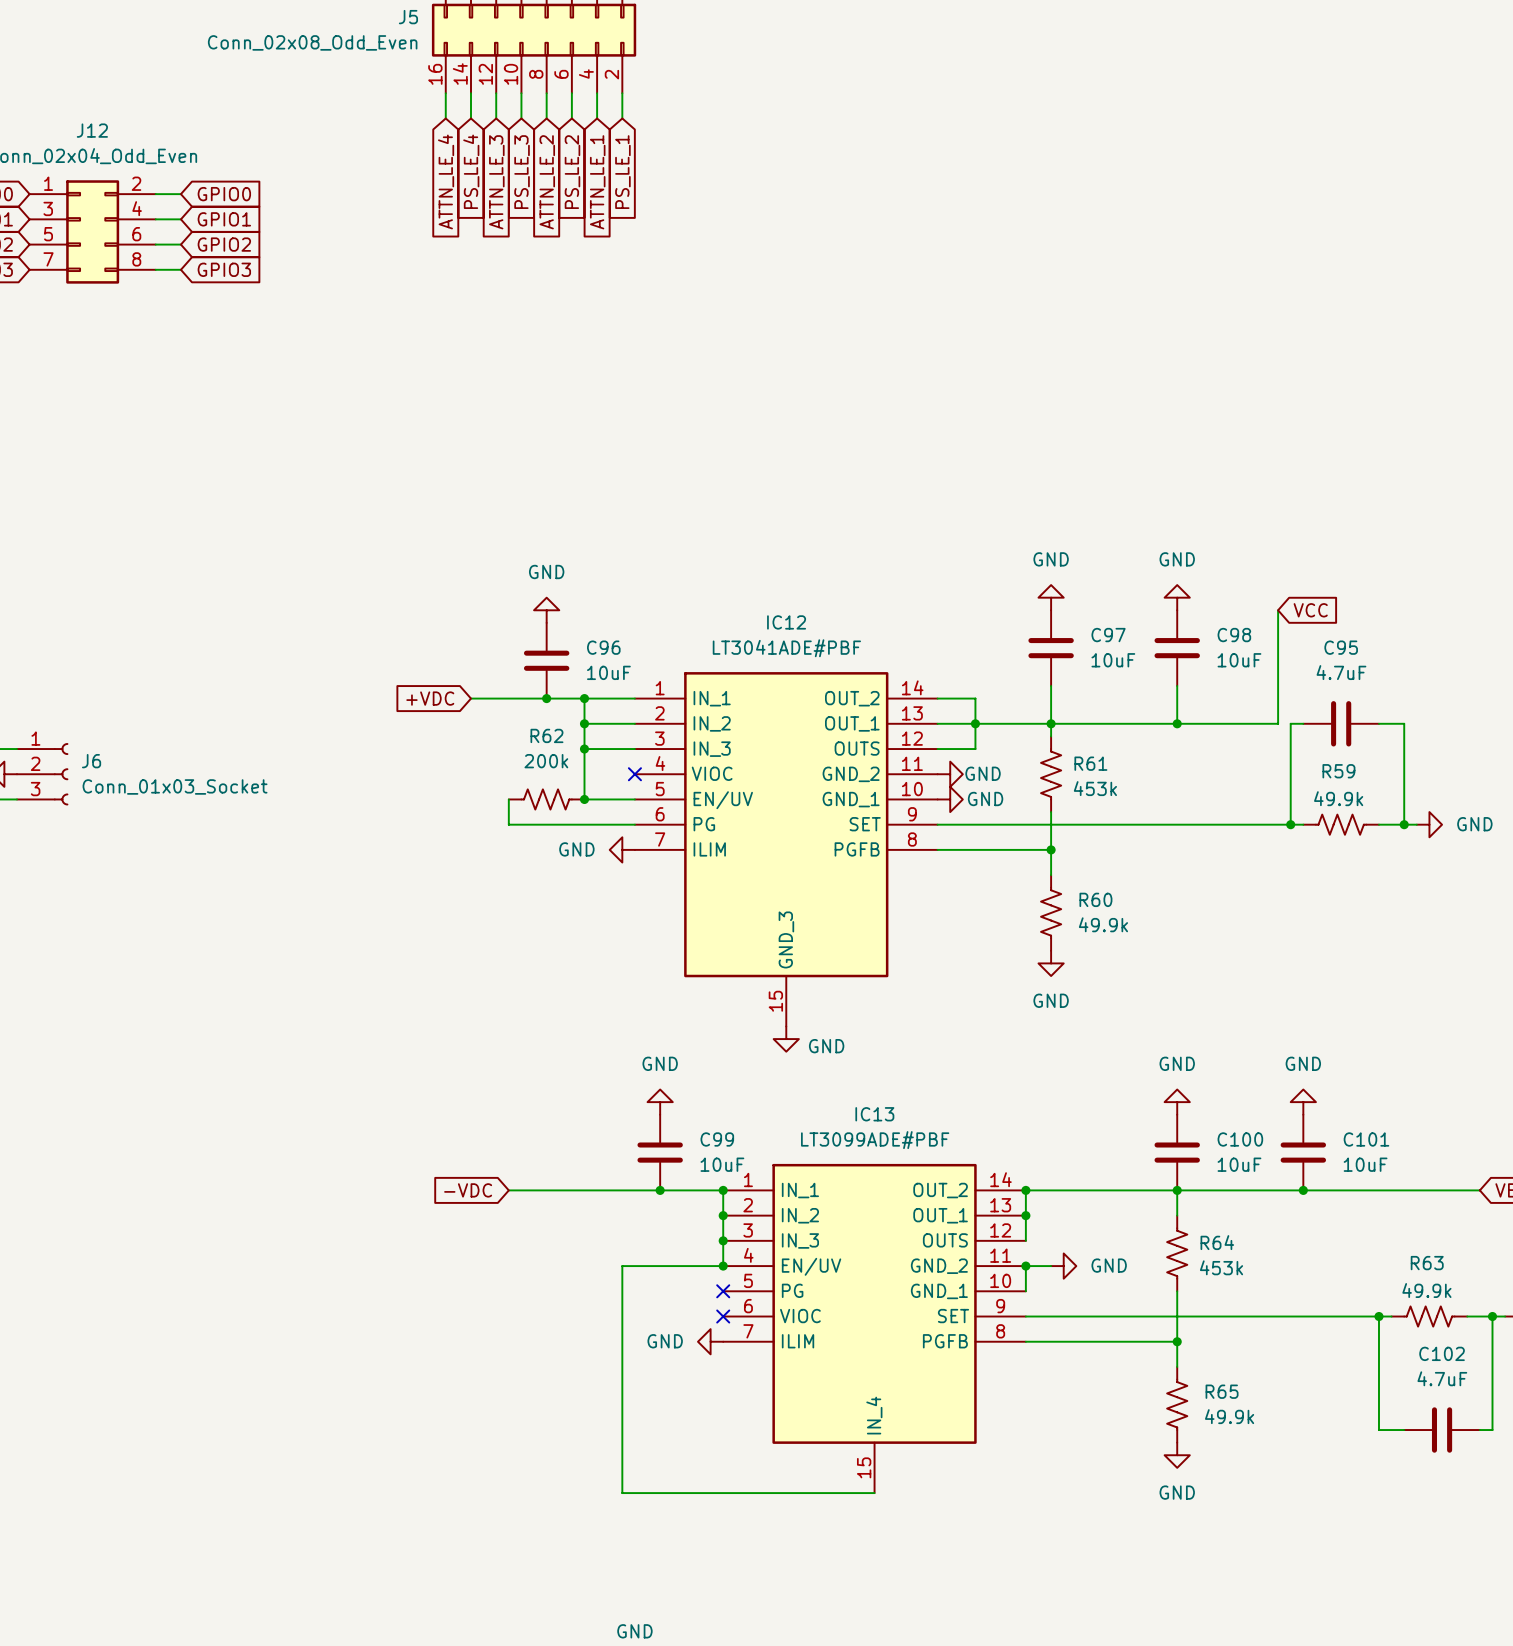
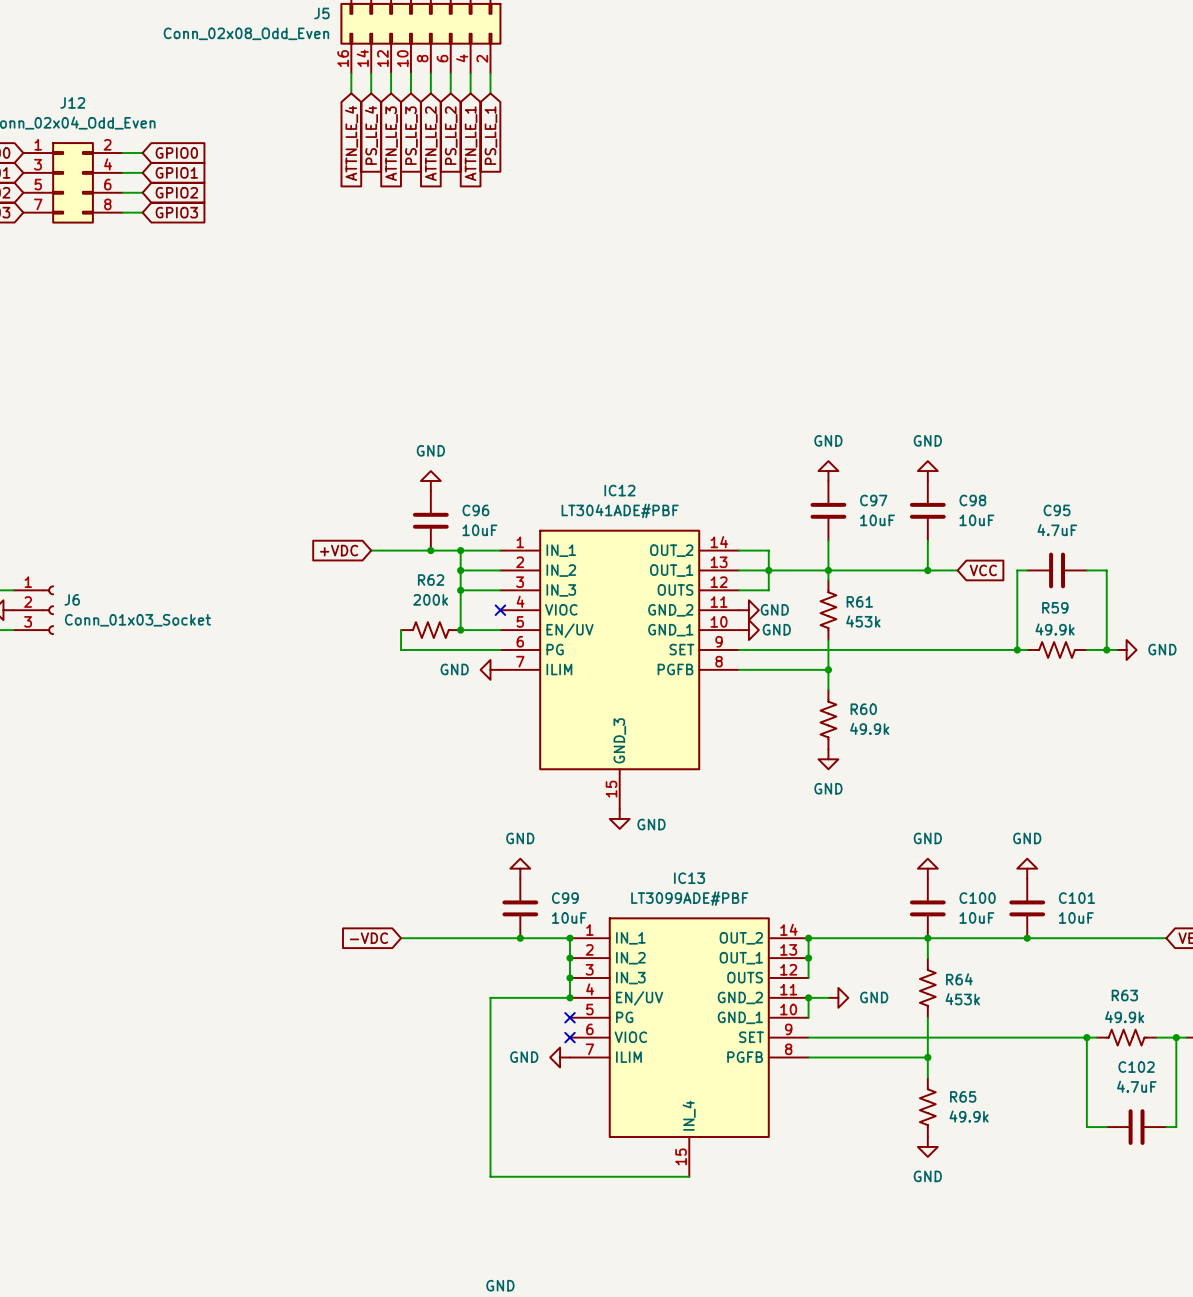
wire: (1278, 610) (1278, 723) (1215, 723) -> none
global label position: VCC (1310, 610) -> VCC (983, 570)

